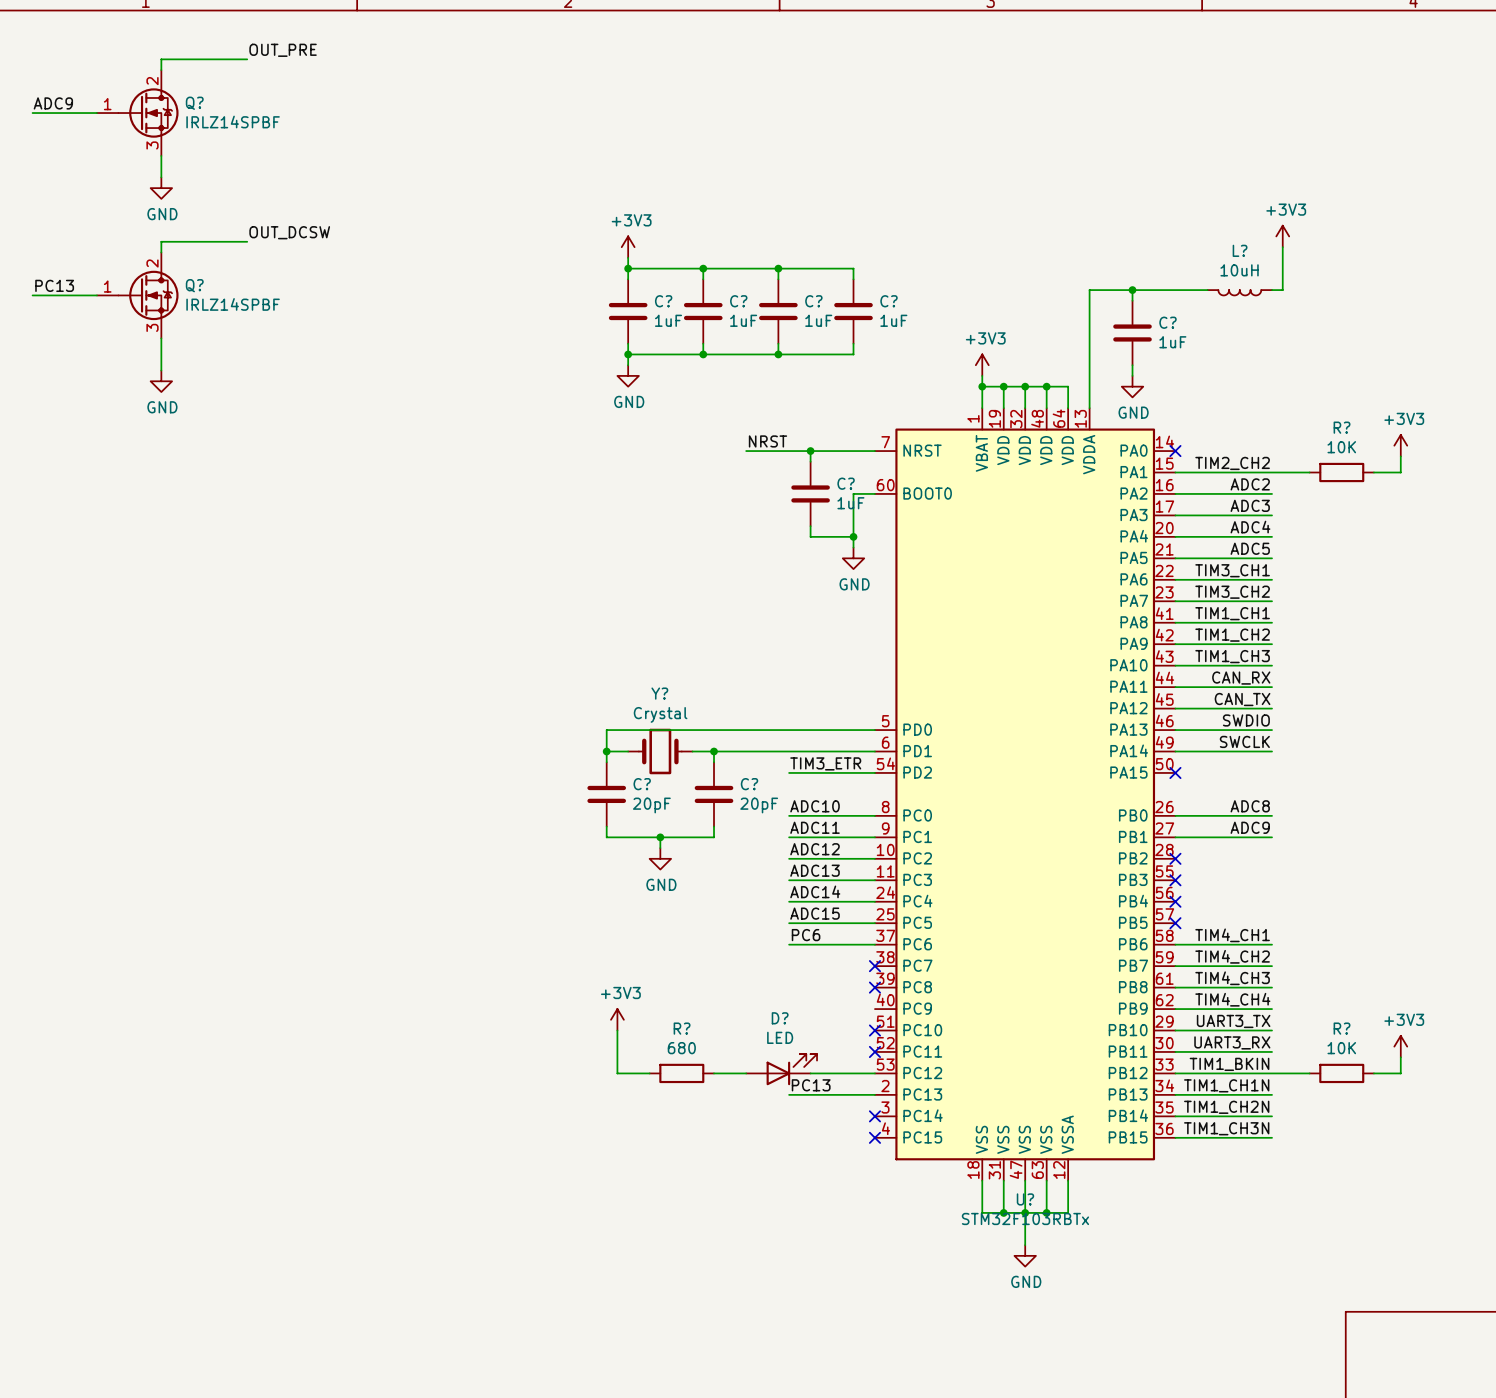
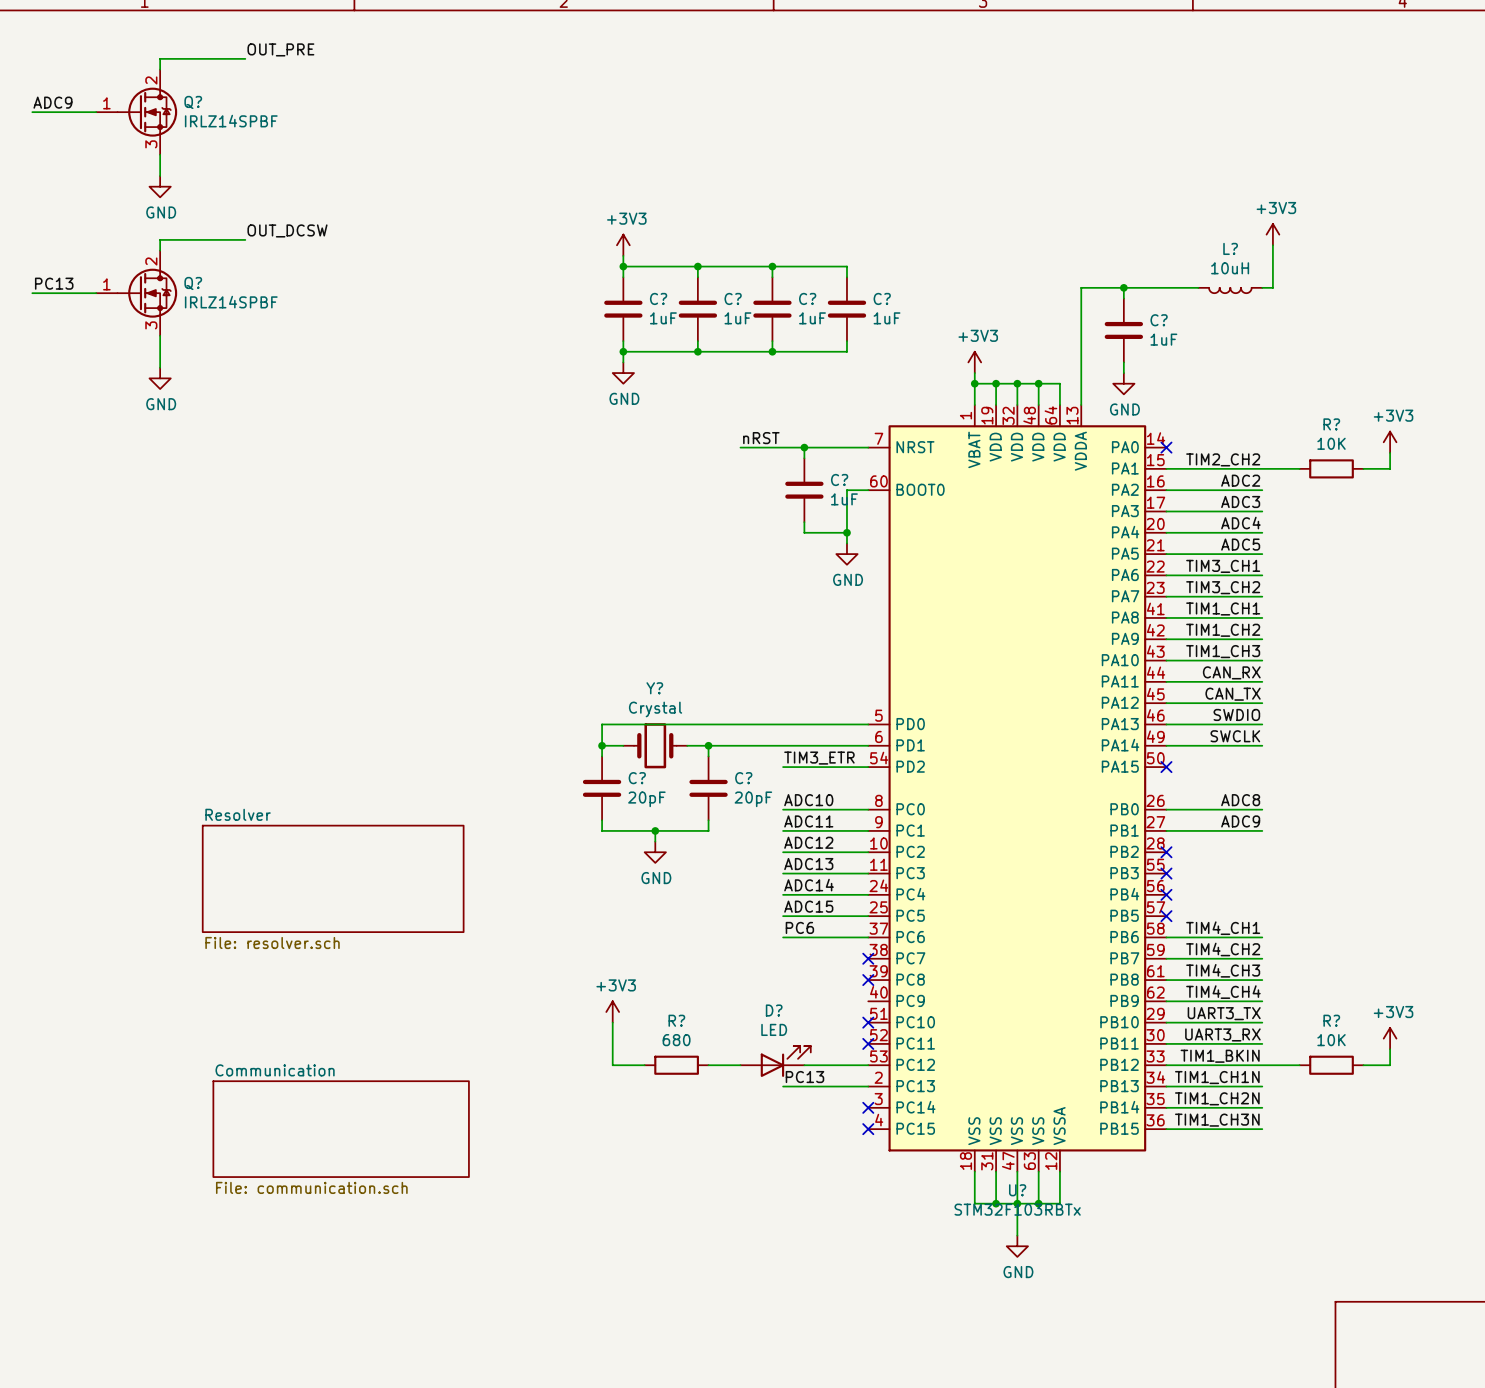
label: NRST (767, 441) -> nRST (761, 438)
sheet Resolver: none -> File: resolver.sch (333, 878)
sheet Communication: none -> File: communication.sch (341, 1129)

